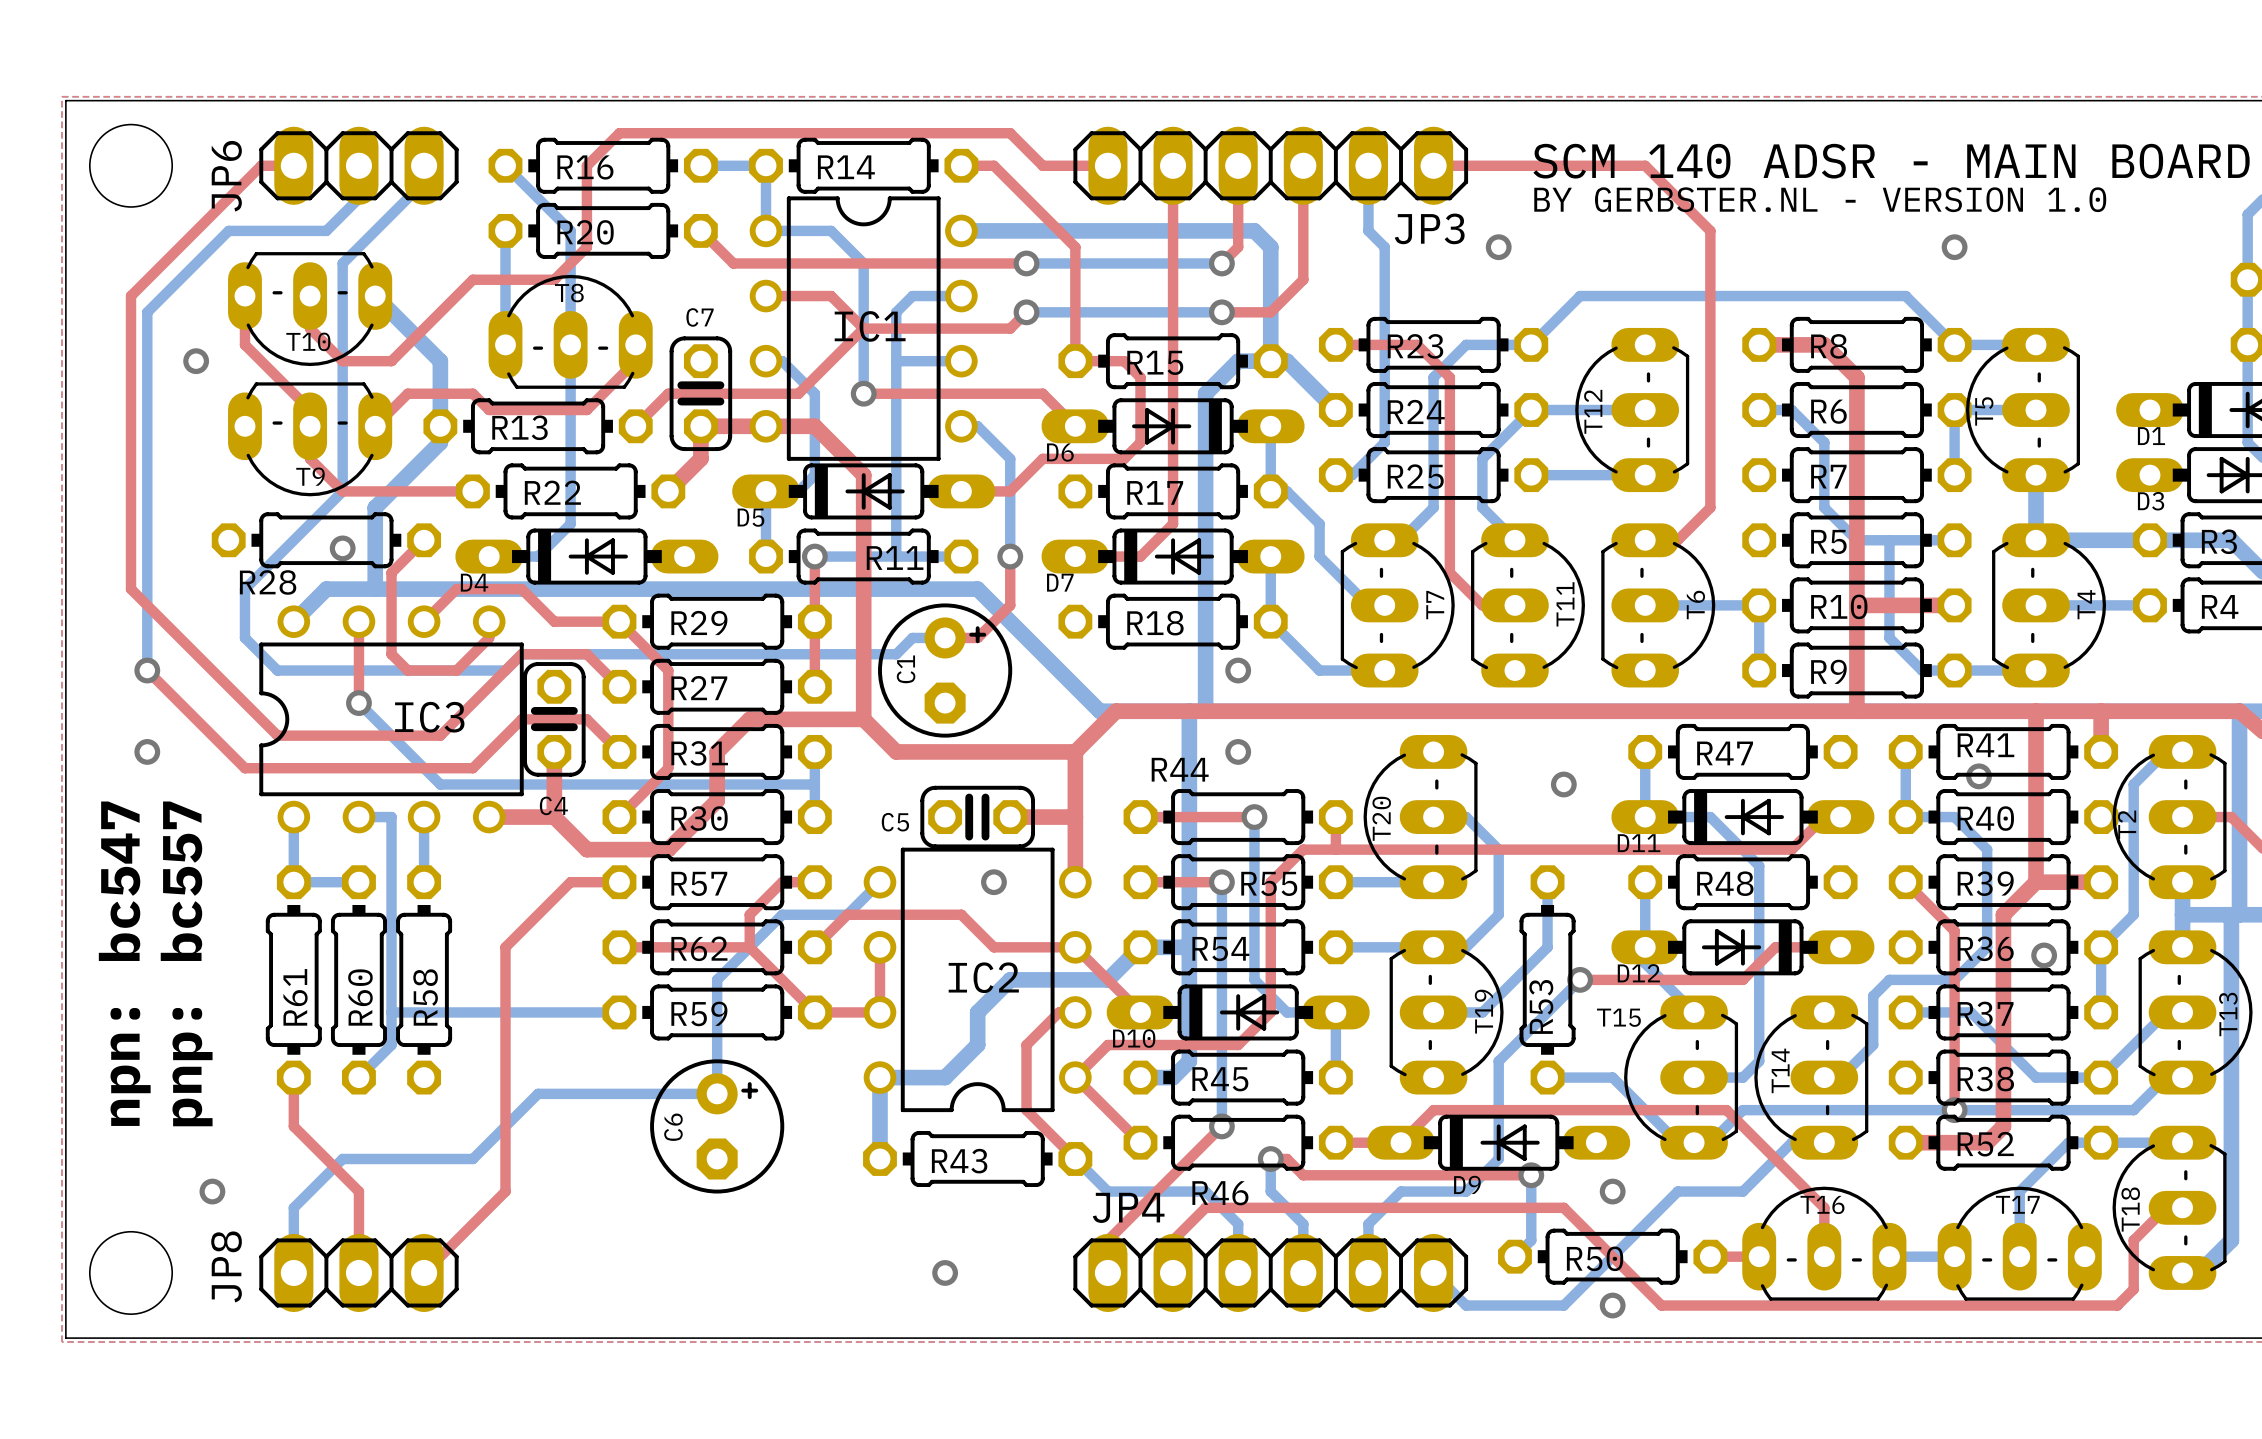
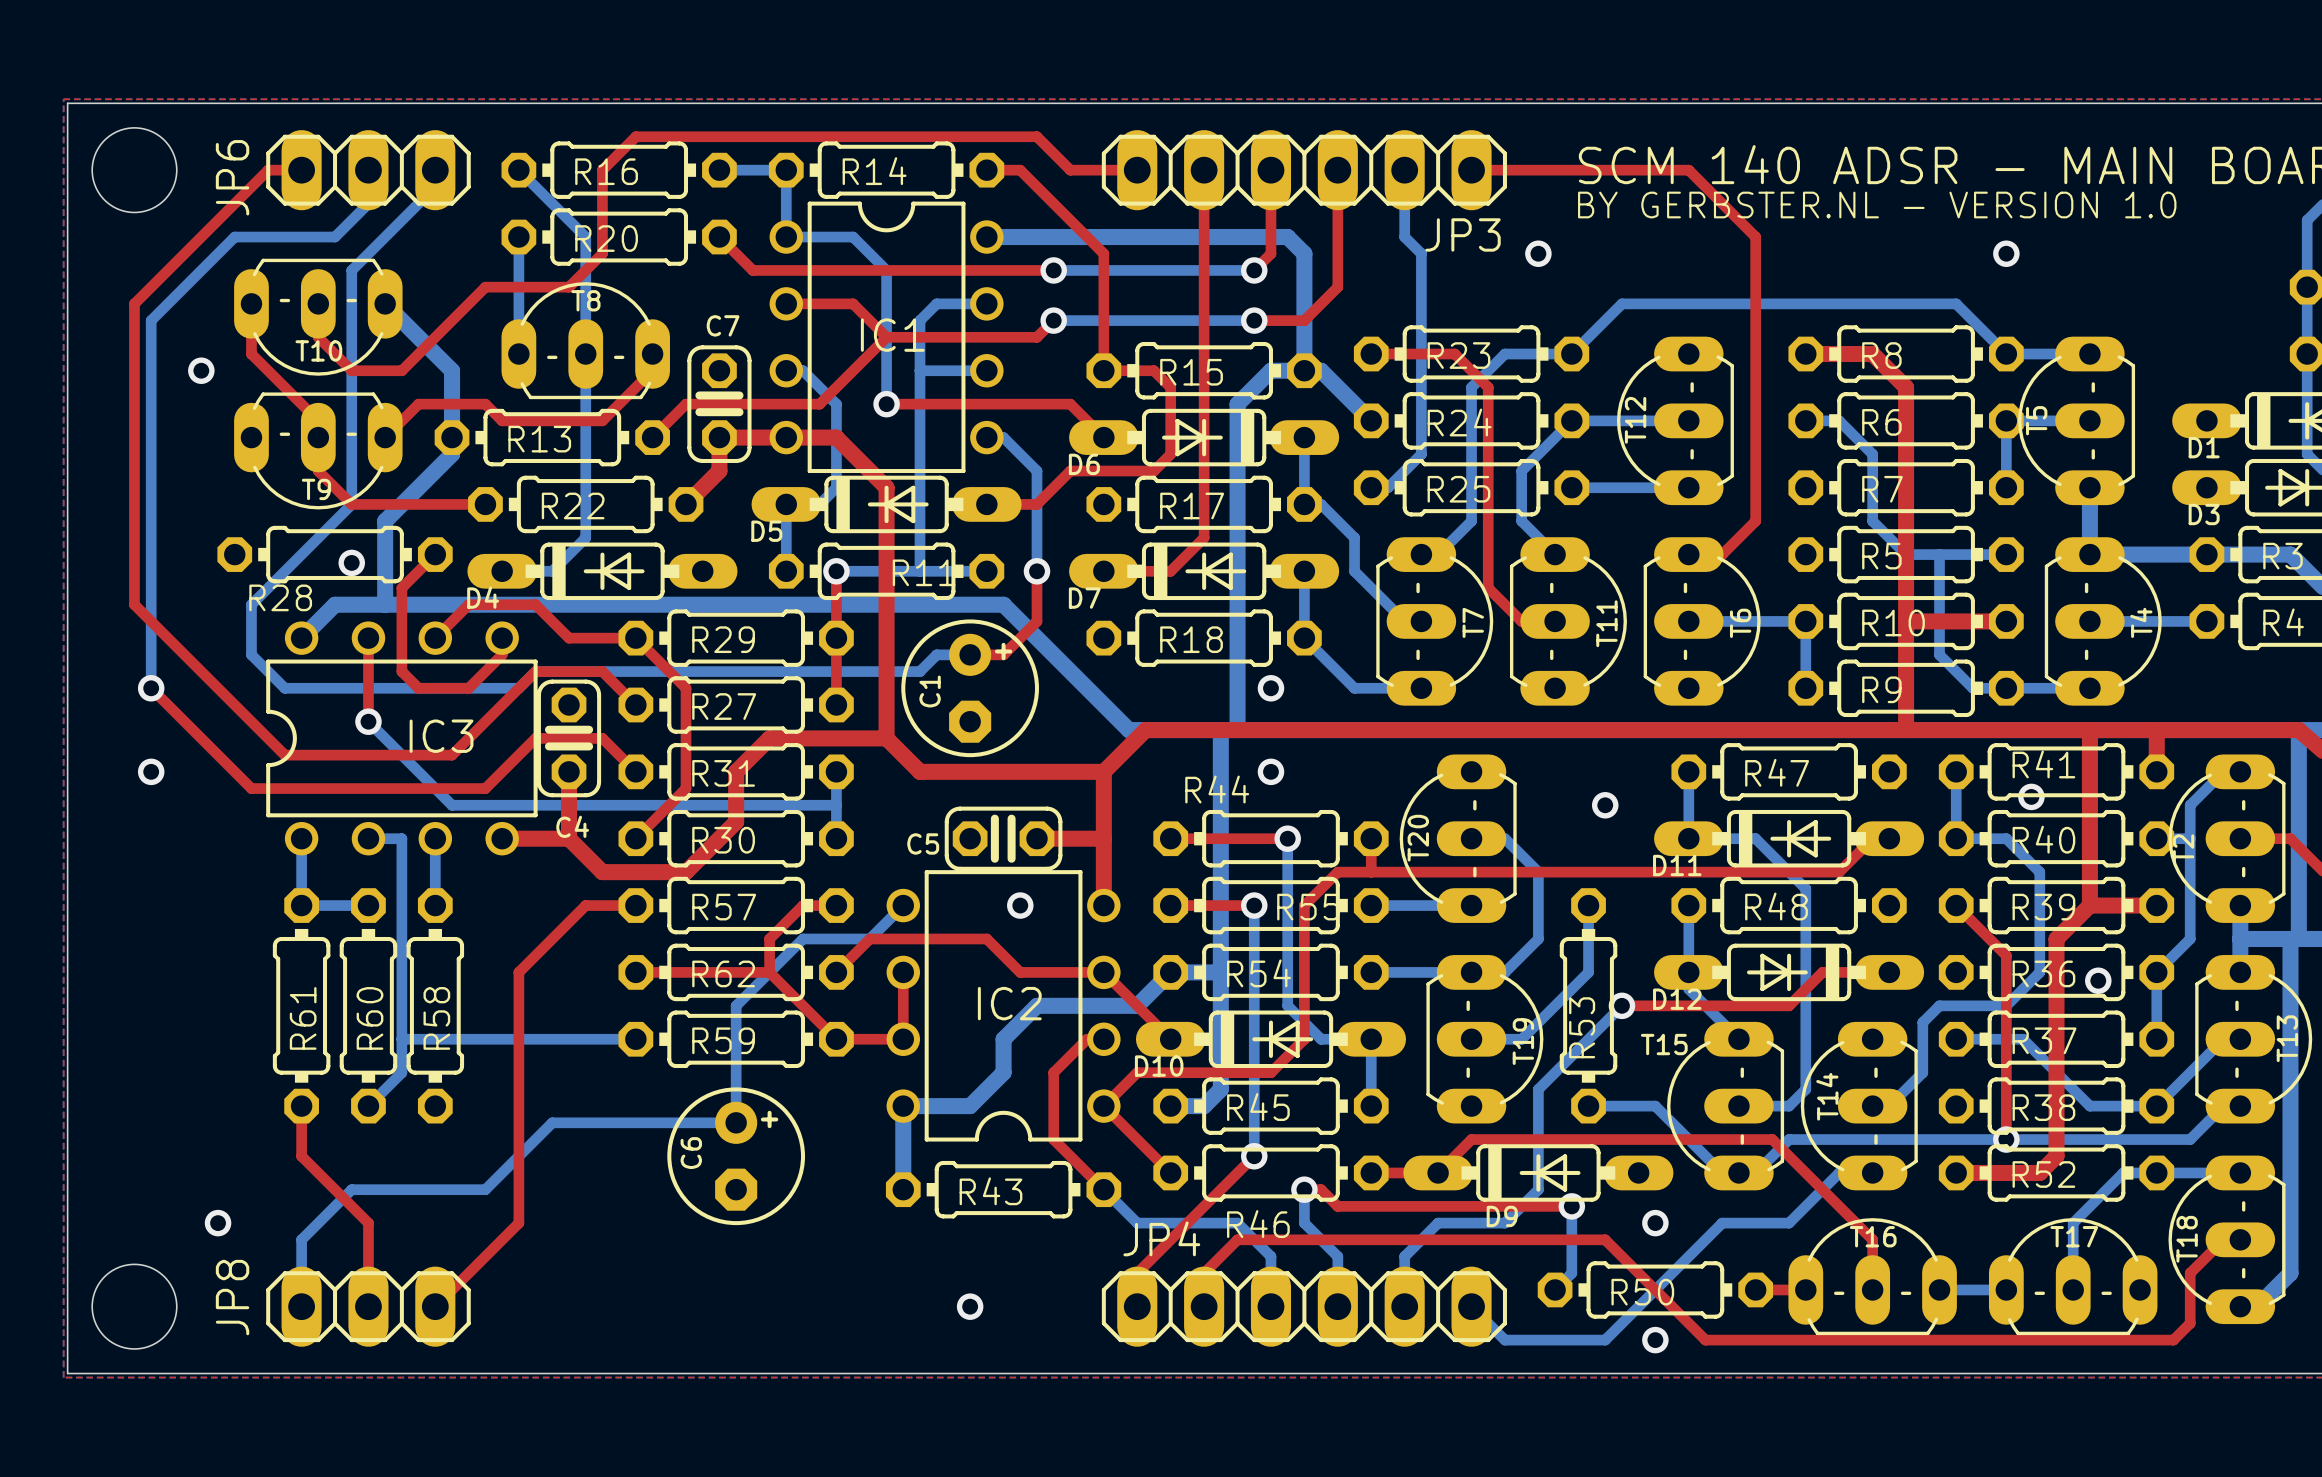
text: npn: bc547 (124, 963) -> none
text: pnp: bc557 (186, 963) -> none

